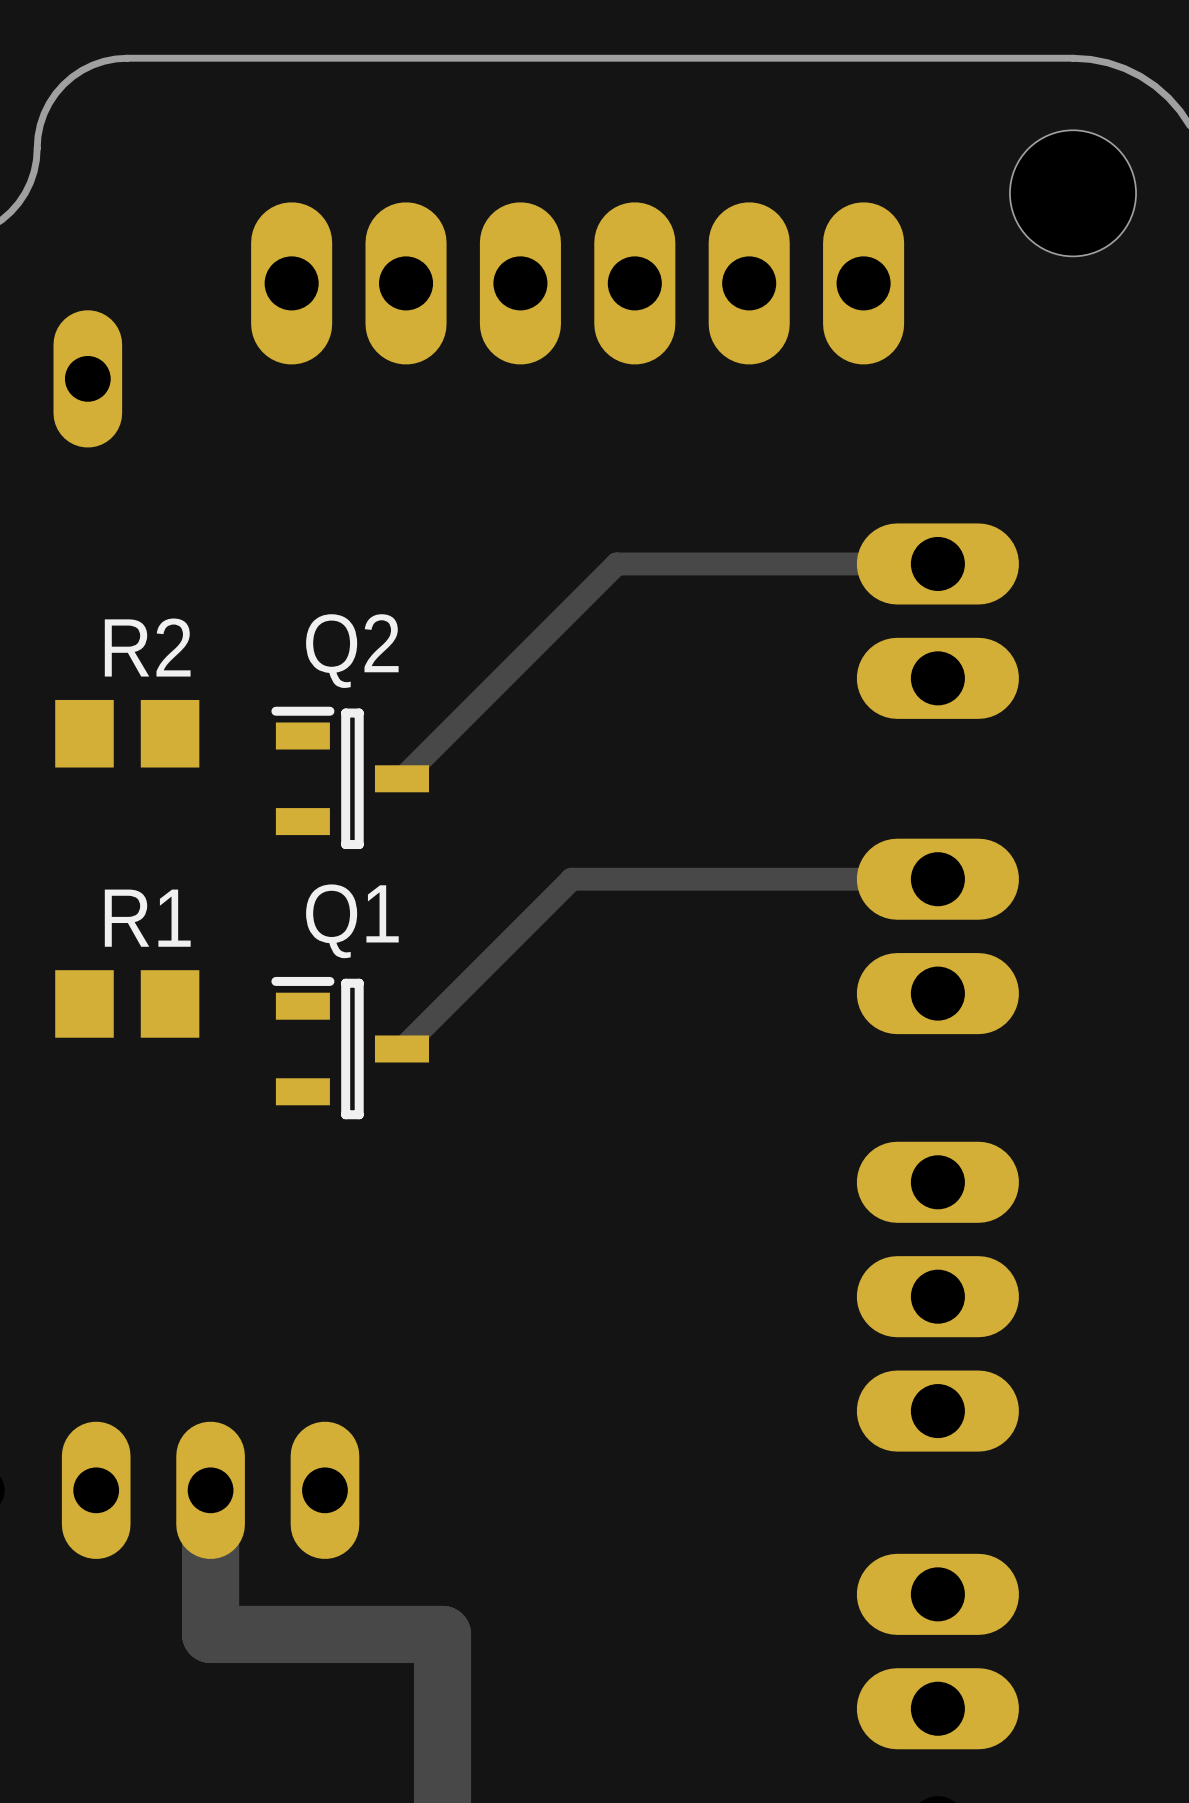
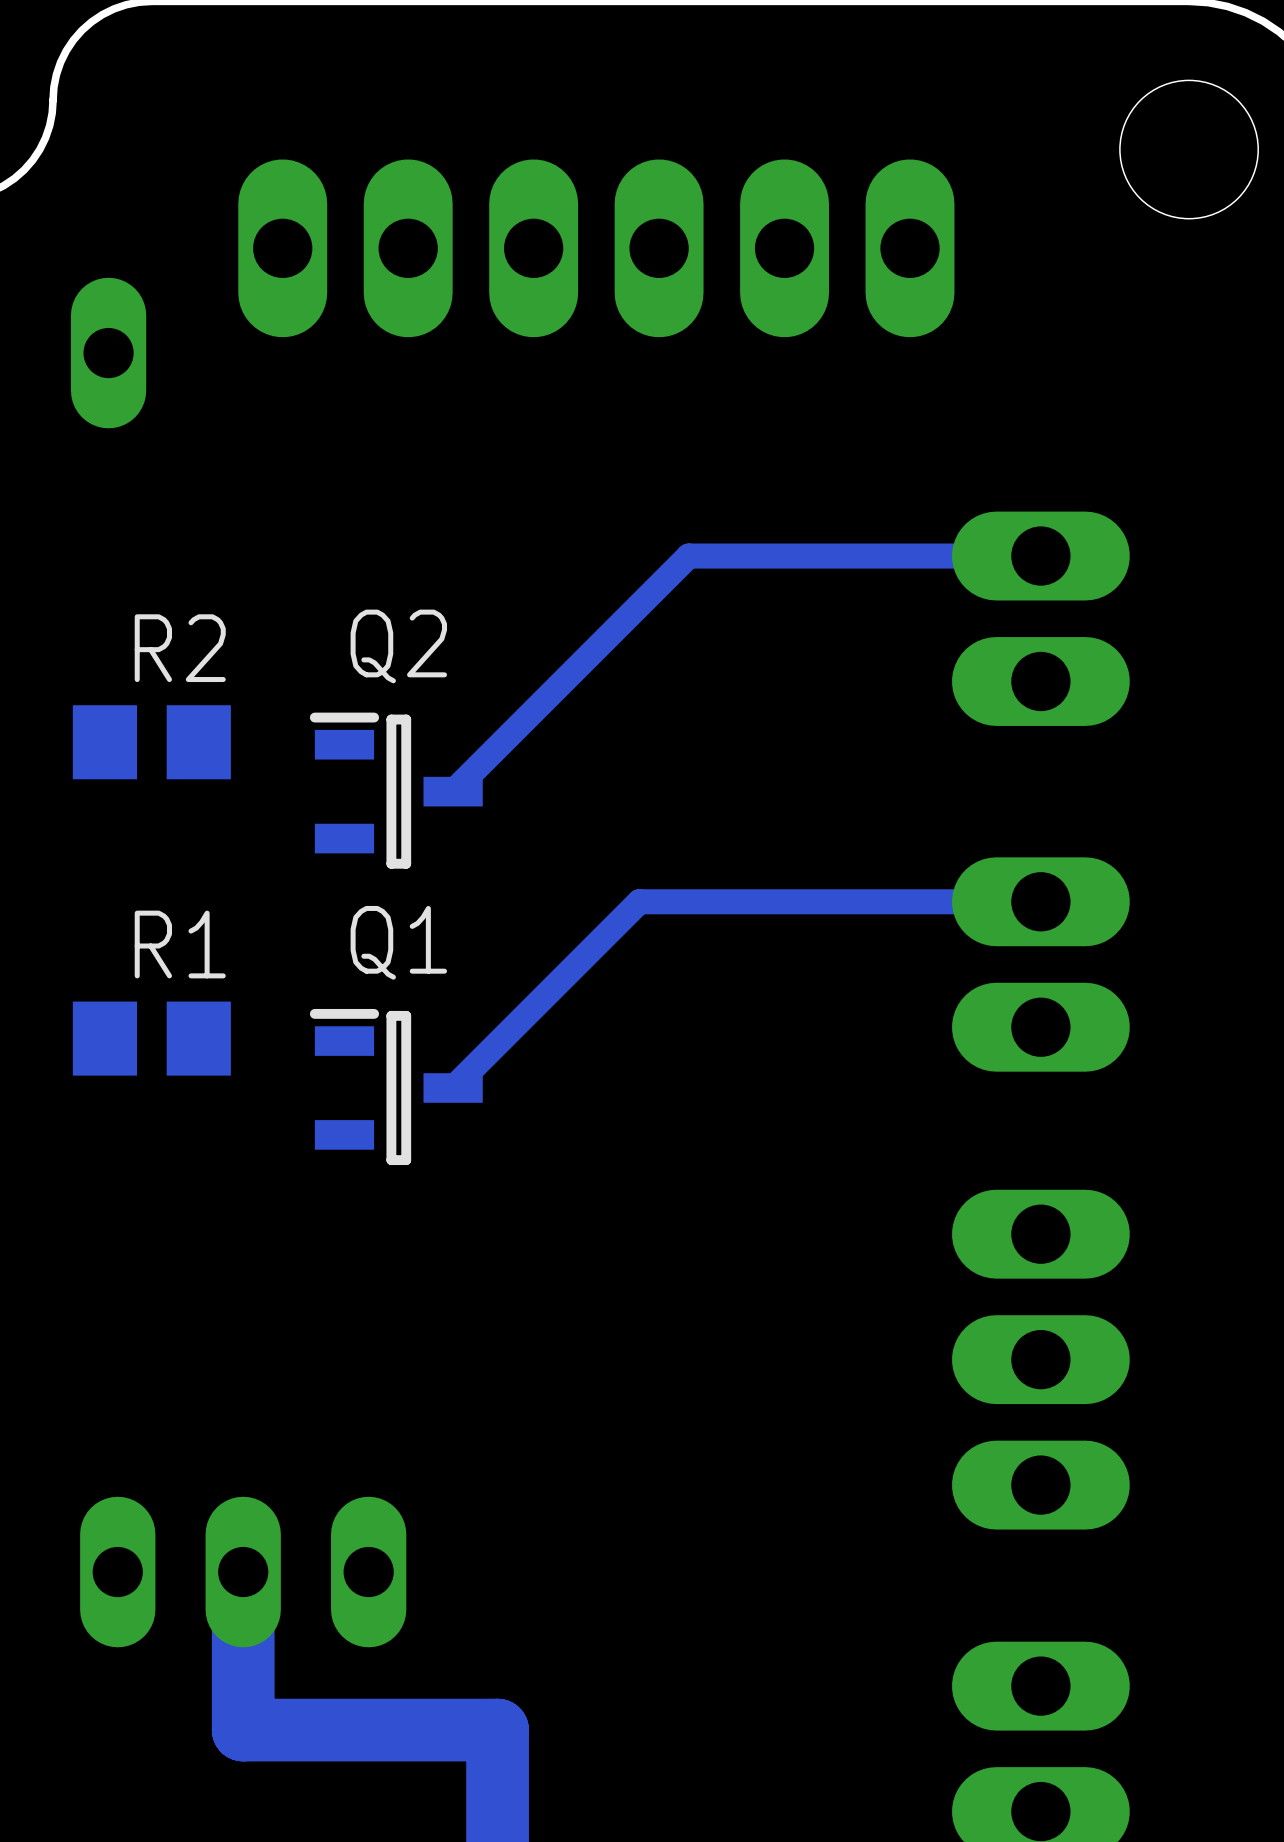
part position: (577, 283) -> (596, 248)

